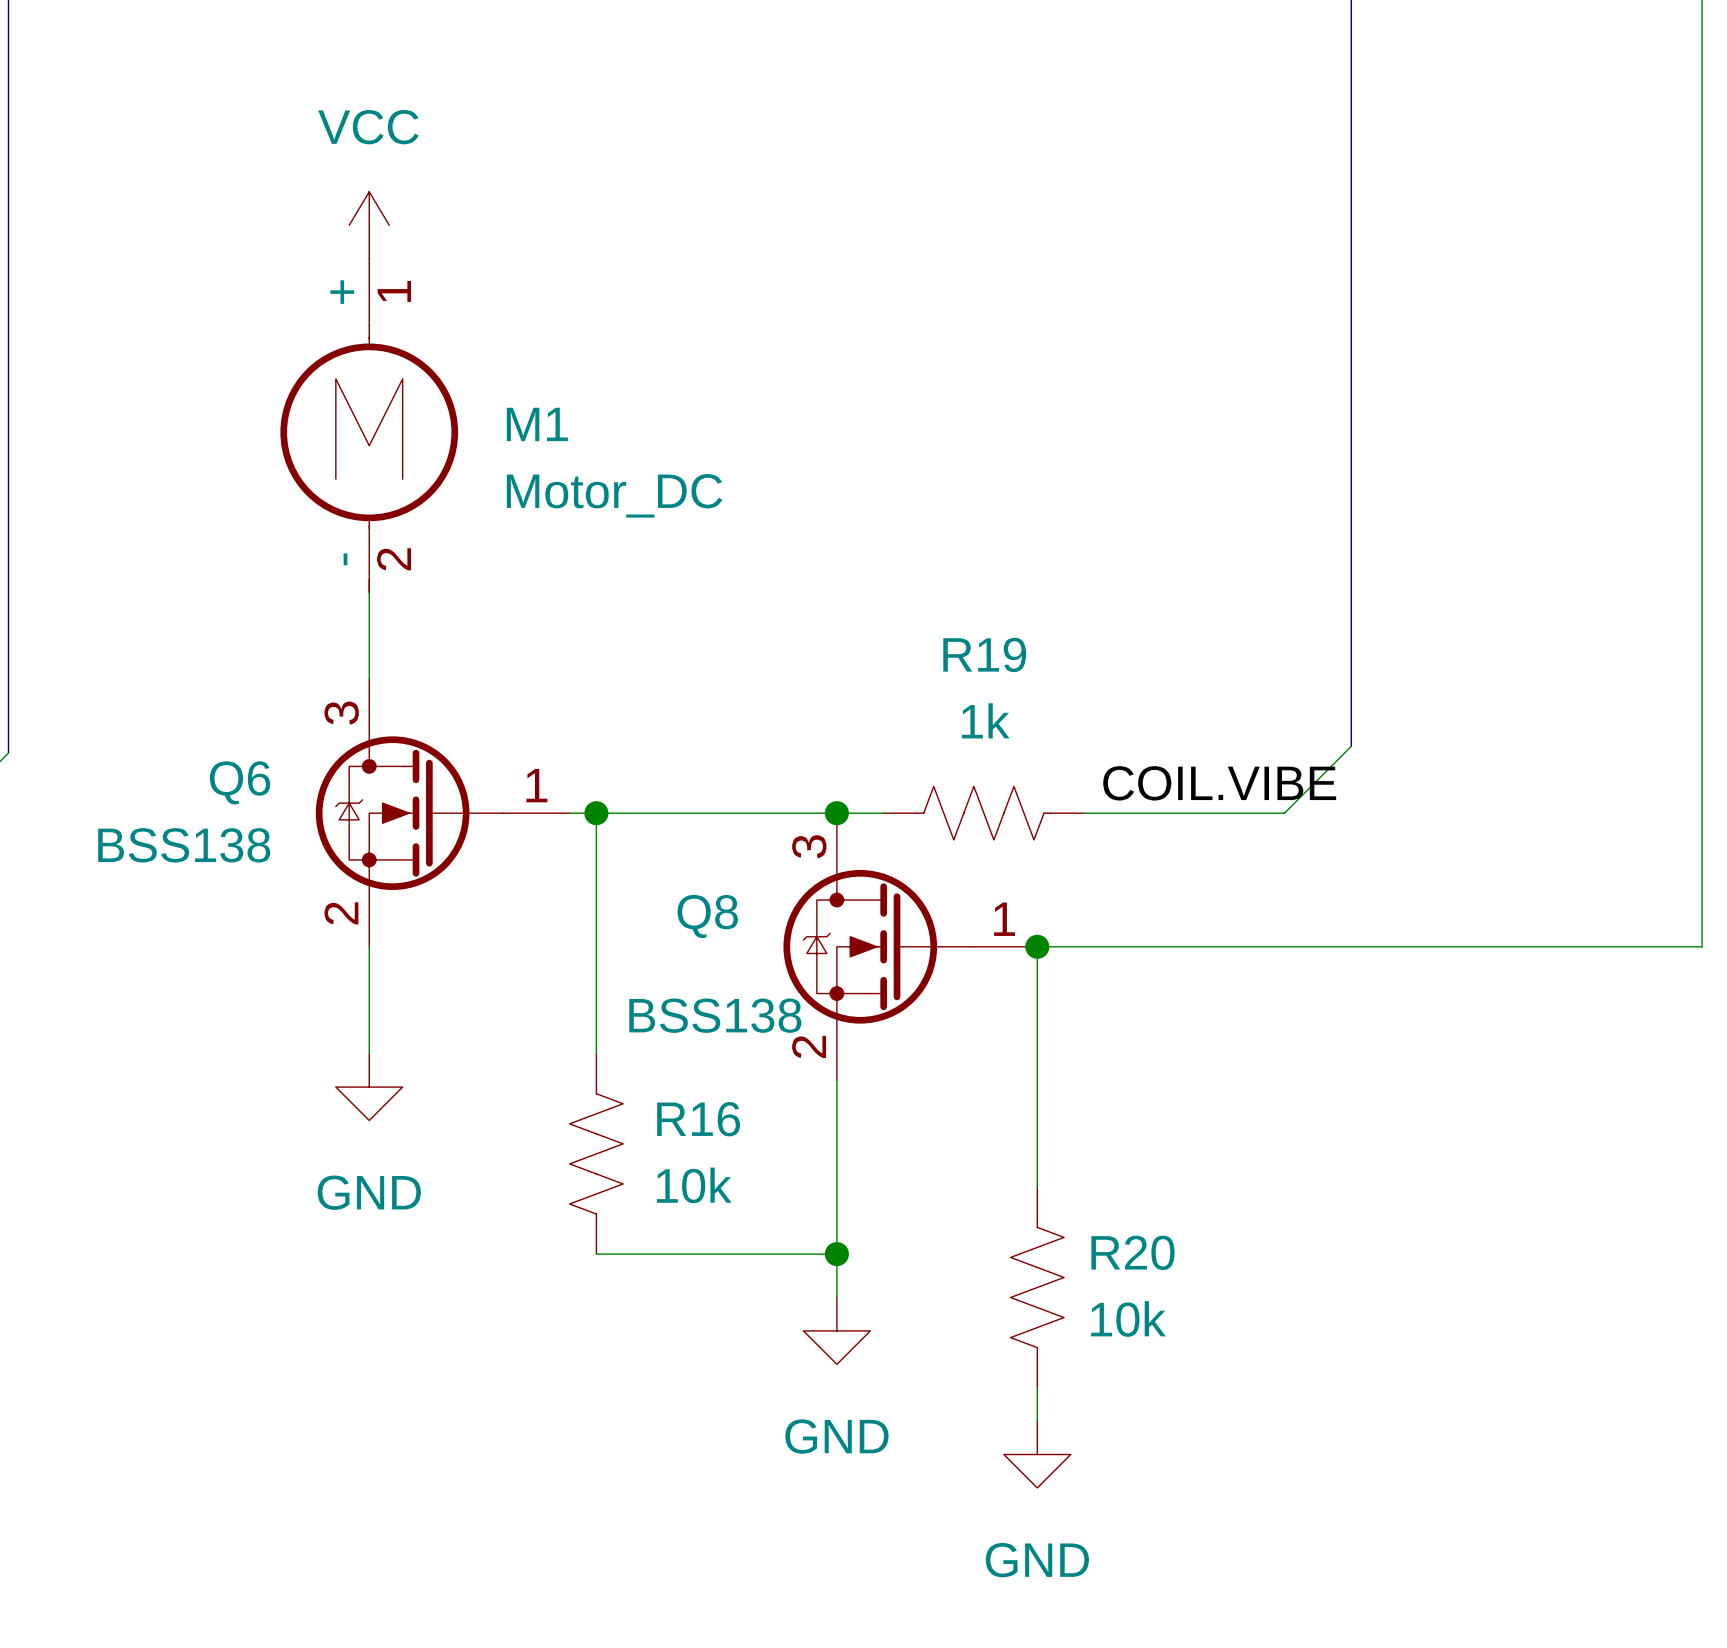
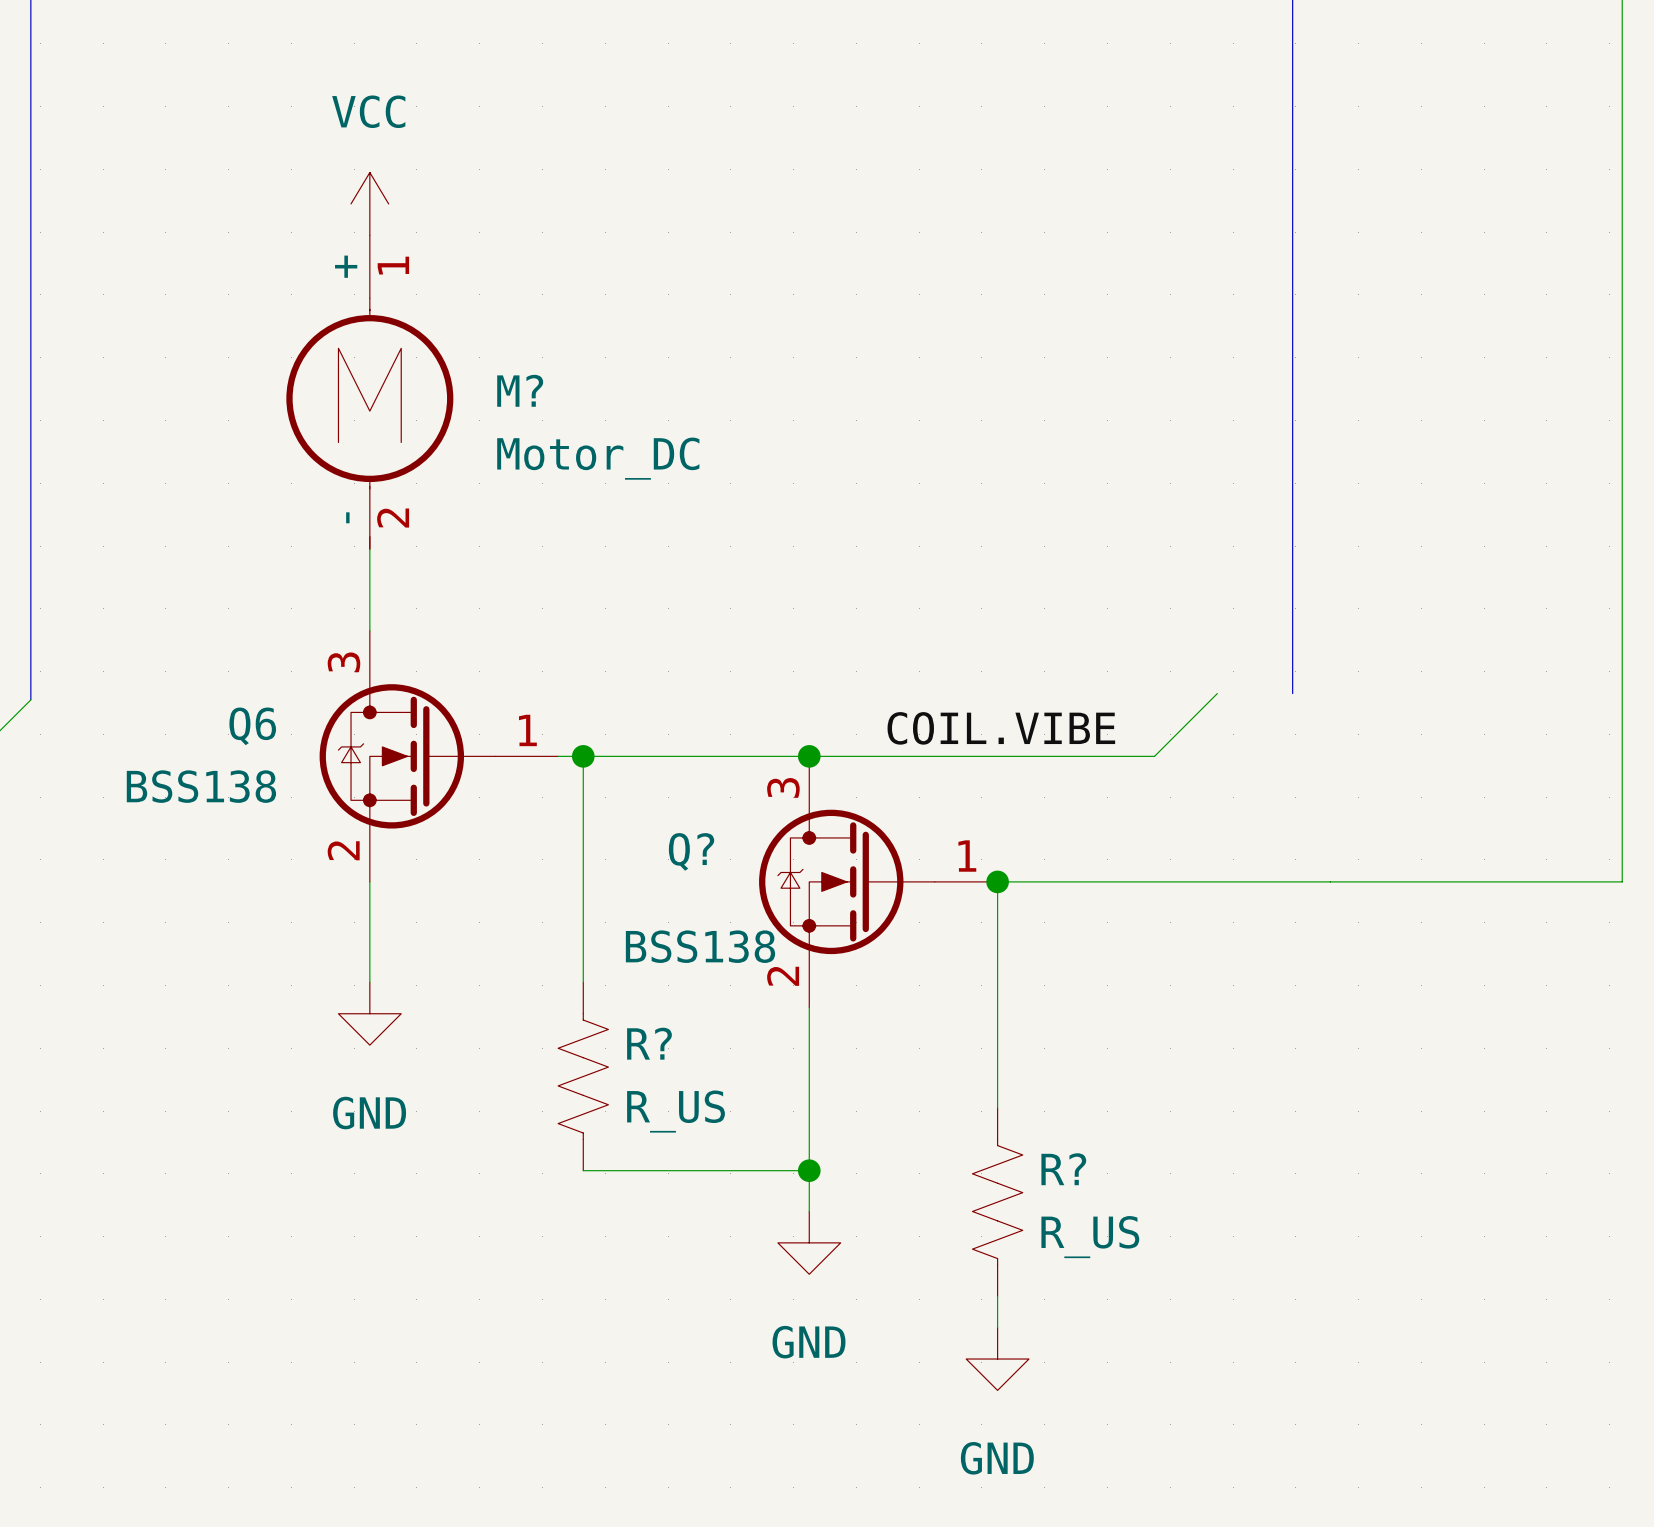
M1 name: M1 (537, 424) -> M? (520, 390)
wire: (1351, 746) (1284, 813) (1204, 813) -> (1217, 693) (1154, 756)
label position: COIL.VIBE (1219, 783) -> COIL.VIBE (1001, 728)
wire: none -> (853, 756) (1041, 756)
R19: 1k (983, 813) -> none
Q8 name: Q8 (707, 916) -> Q? (691, 851)
R16 name: R16 (698, 1119) -> R? (649, 1043)
R16 value: 10k (694, 1185) -> R_US (676, 1111)
R20 name: R20 (1133, 1252) -> R? (1063, 1169)
R20 value: 10k (1128, 1319) -> R_US (1090, 1237)

